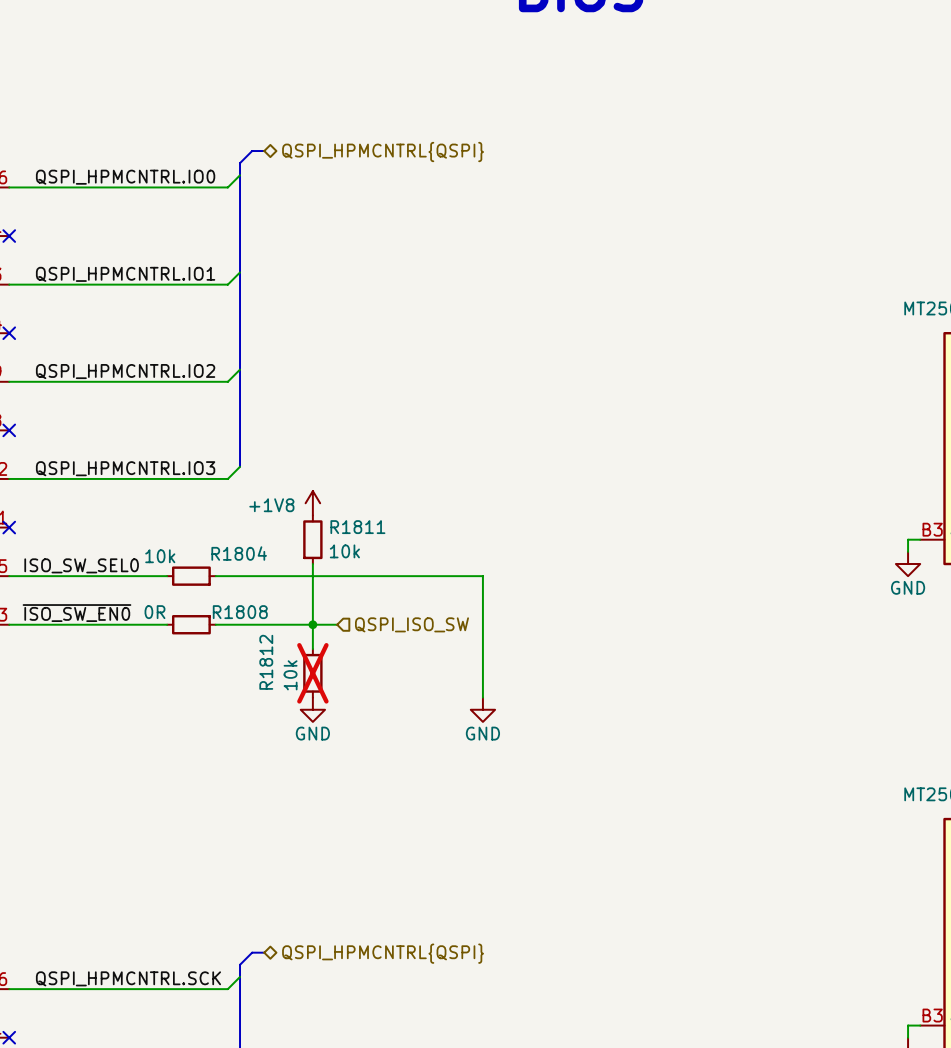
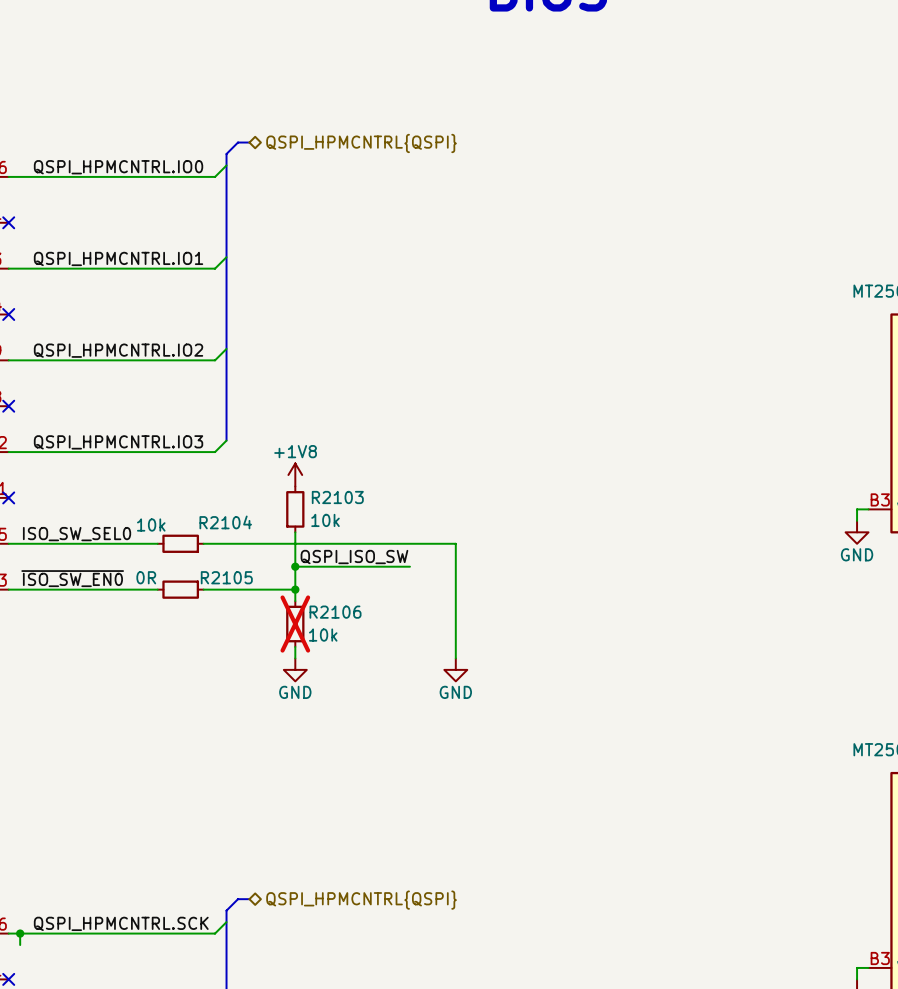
power symbol text position: +1V8 (271, 505) -> +1V8 (295, 451)
R1811 name: R1811 (357, 527) -> R2103 (337, 497)
R1804 name: R1804 (239, 553) -> R2104 (225, 522)
label: none -> QSPI_ISO_SW (354, 557)
wire: none -> (295, 566) (409, 566)
junction: none -> (295, 566)
R1808 name: R1808 (240, 612) -> R2105 (226, 577)
wire: (312, 624) (337, 624) -> none
hierarchical label: QSPI_ISO_SW (411, 624) -> none
R2106: none -> (295, 624)
R1812: (312, 673) -> none
wire: none -> (20, 933) (20, 945)
junction: none -> (20, 933)

